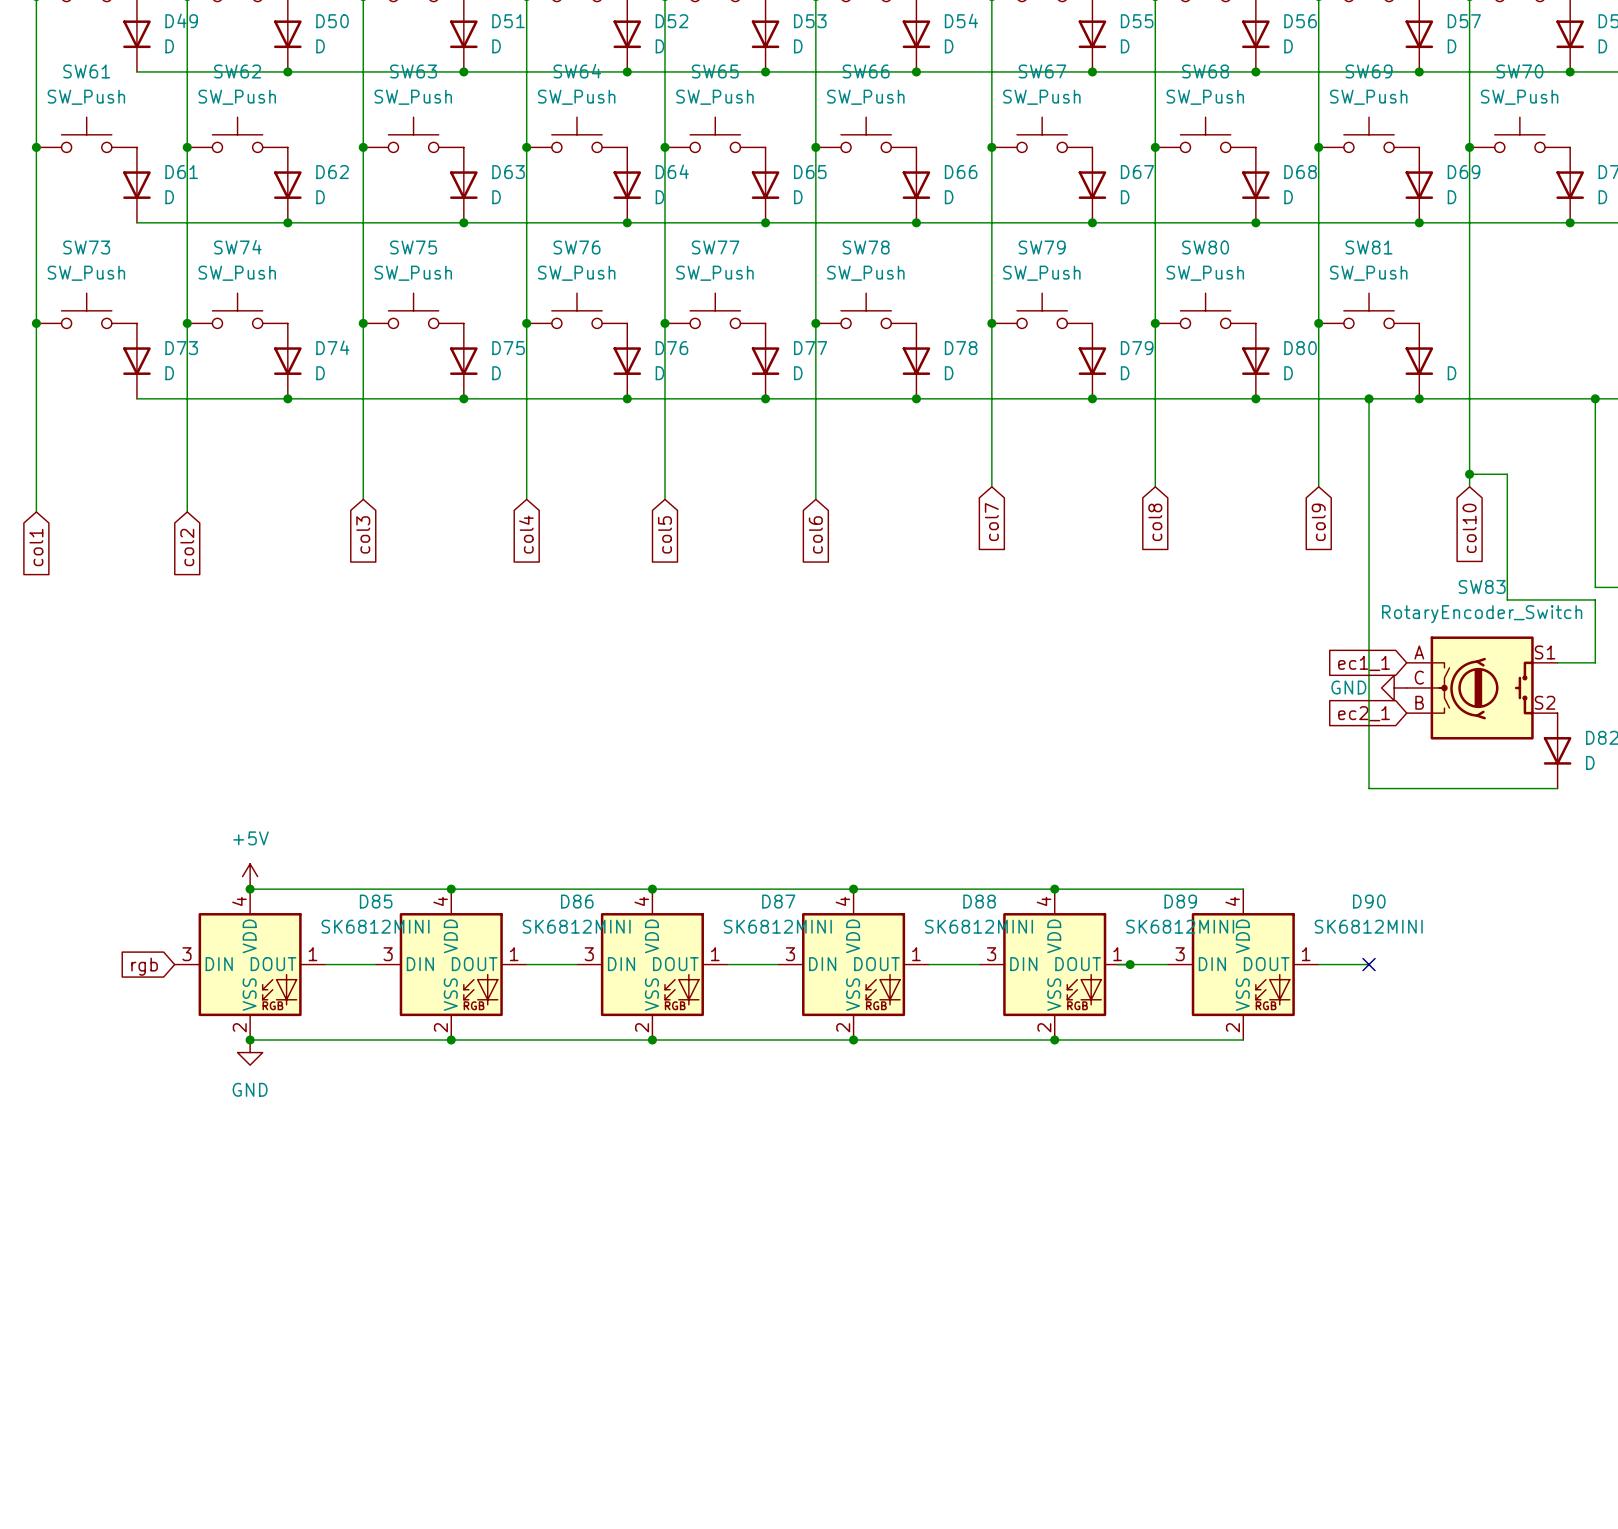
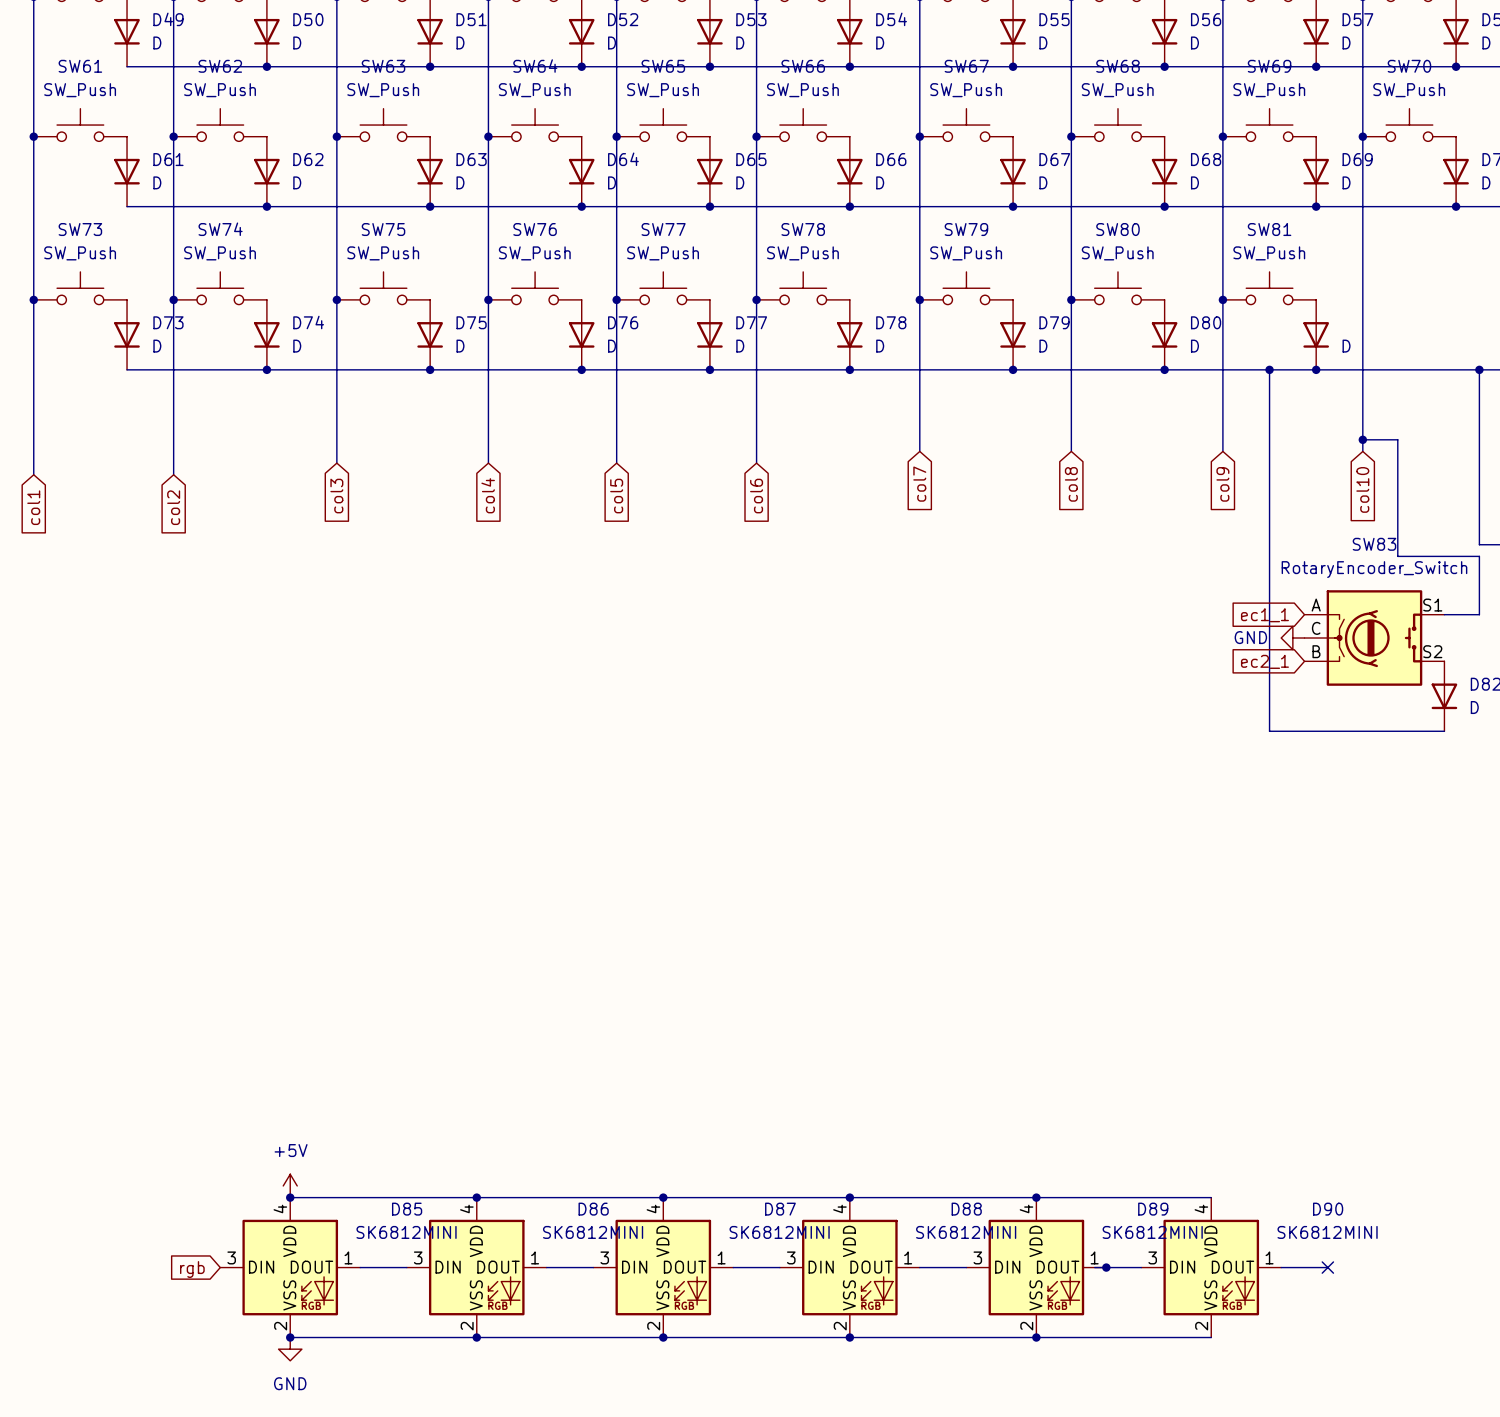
power symbol: +5V (250, 876) -> none
wire: (250, 889) (1243, 889) -> none
junction: (250, 889) -> none
junction: (451, 889) -> none
junction: (652, 889) -> none
junction: (853, 889) -> none
junction: (1054, 889) -> none
D85 position: (250, 964) -> (290, 1267)
wire: (325, 964) (375, 964) -> none
D86 position: (451, 964) -> (476, 1267)
wire: (526, 964) (576, 964) -> none
D87 position: (652, 964) -> (663, 1267)
wire: (727, 964) (778, 964) -> none
D88 position: (853, 964) -> (849, 1267)
wire: (929, 964) (979, 964) -> none
D89 position: (1054, 964) -> (1036, 1267)
wire: (1117, 964) (1167, 964) -> none
junction: (1130, 964) -> none
D90 position: (1243, 964) -> (1211, 1267)
wire: (1318, 964) (1369, 964) -> none
no-connect mark: (1369, 964) -> none
global label: rgb (144, 966) -> none
wire: (250, 1040) (1243, 1040) -> none
junction: (250, 1040) -> none
junction: (451, 1040) -> none
junction: (652, 1040) -> none
junction: (853, 1040) -> none
junction: (1054, 1040) -> none
power symbol: GND (250, 1052) -> none
power symbol: none -> +5V (290, 1185)
wire: none -> (290, 1197) (1211, 1197)
junction: none -> (290, 1197)
junction: none -> (476, 1197)
junction: none -> (663, 1197)
junction: none -> (849, 1197)
junction: none -> (1036, 1197)
wire: none -> (360, 1267) (406, 1267)
wire: none -> (546, 1267) (593, 1267)
wire: none -> (733, 1267) (779, 1267)
wire: none -> (919, 1267) (966, 1267)
wire: none -> (1094, 1267) (1141, 1267)
junction: none -> (1106, 1267)
wire: none -> (1281, 1267) (1327, 1267)
no-connect mark: none -> (1327, 1267)
global label: none -> rgb (192, 1269)
wire: none -> (290, 1337) (1211, 1337)
junction: none -> (290, 1337)
junction: none -> (476, 1337)
junction: none -> (663, 1337)
junction: none -> (849, 1337)
junction: none -> (1036, 1337)
power symbol: none -> GND (290, 1349)

